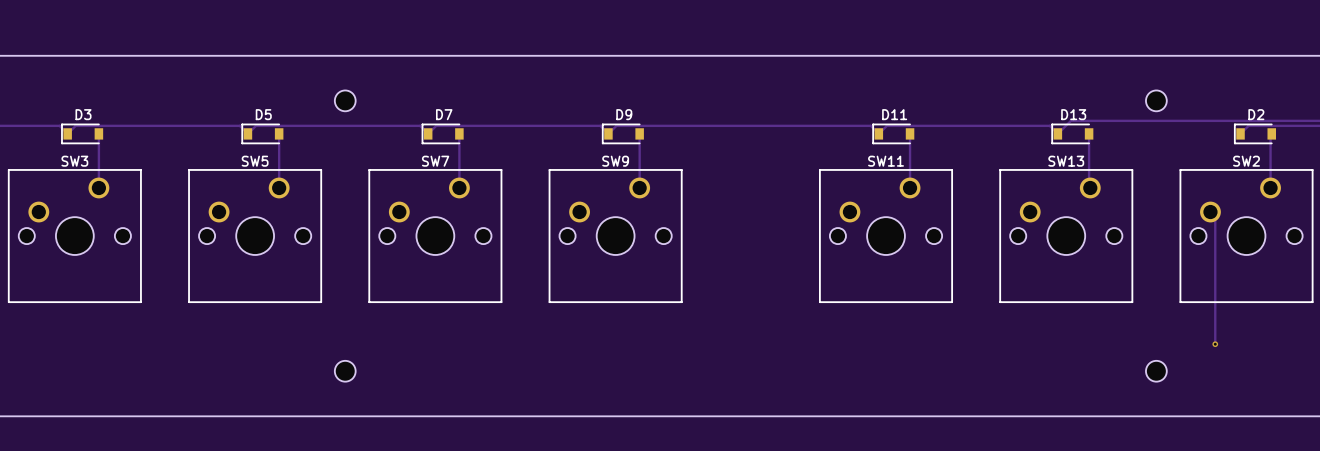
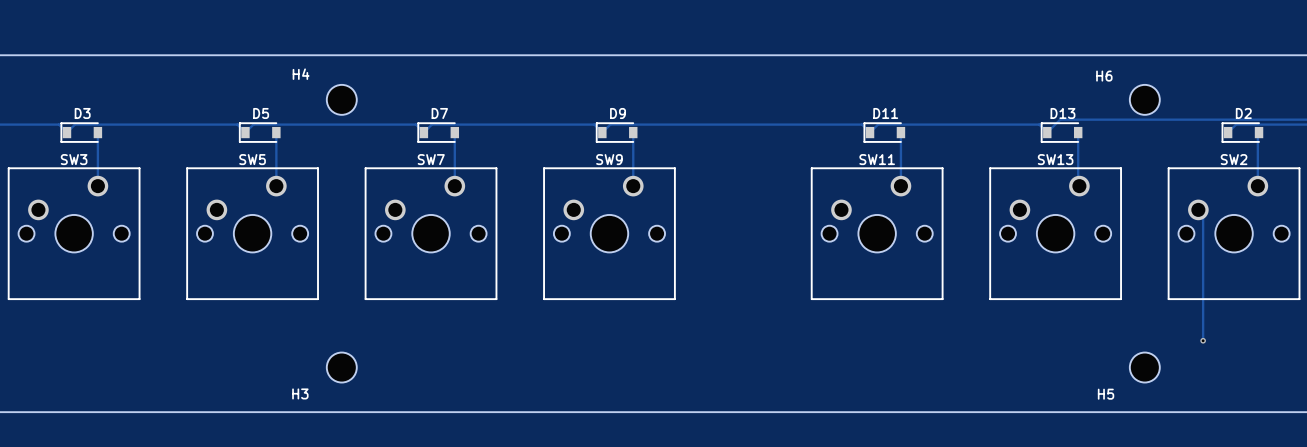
part: (345, 100) -> none
H4: none -> (341, 99)
part: (1156, 100) -> none
H6: none -> (1144, 99)
part: (345, 371) -> none
H3: none -> (341, 367)
part: (1156, 371) -> none
H5: none -> (1144, 367)

